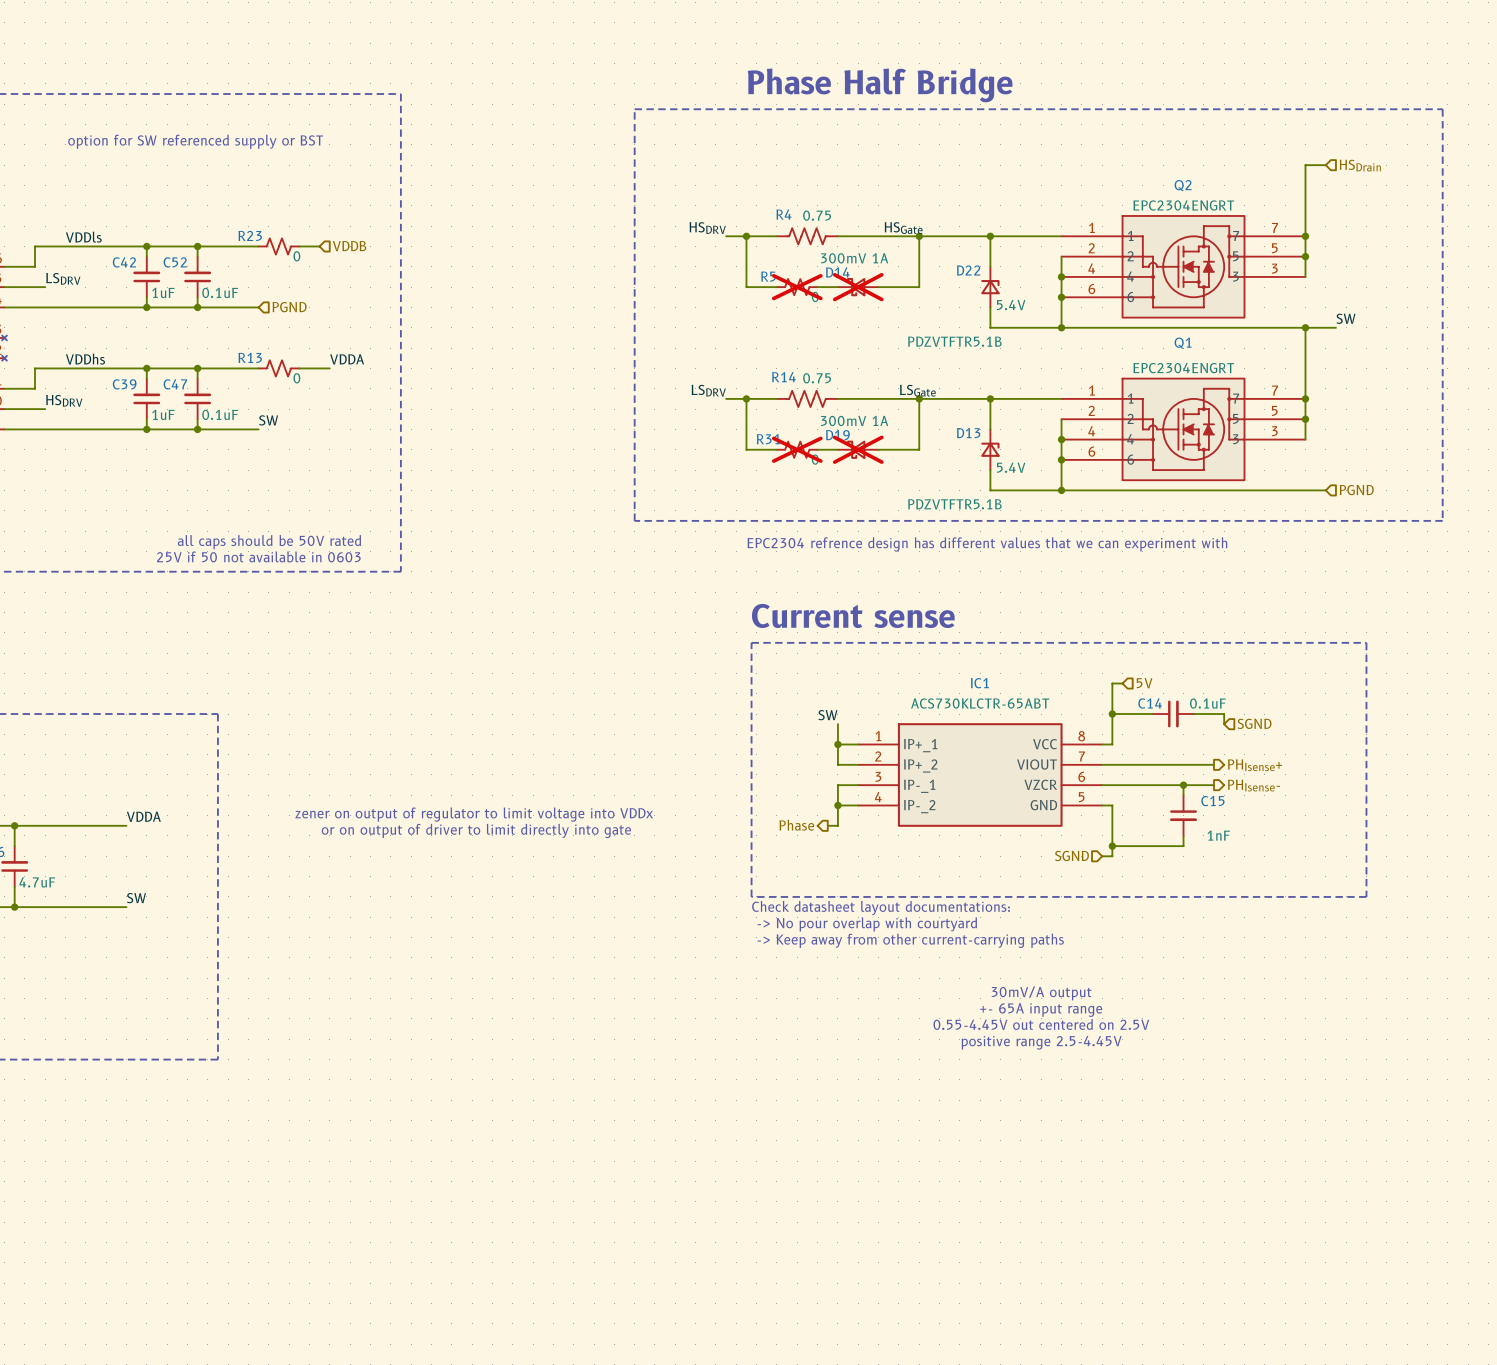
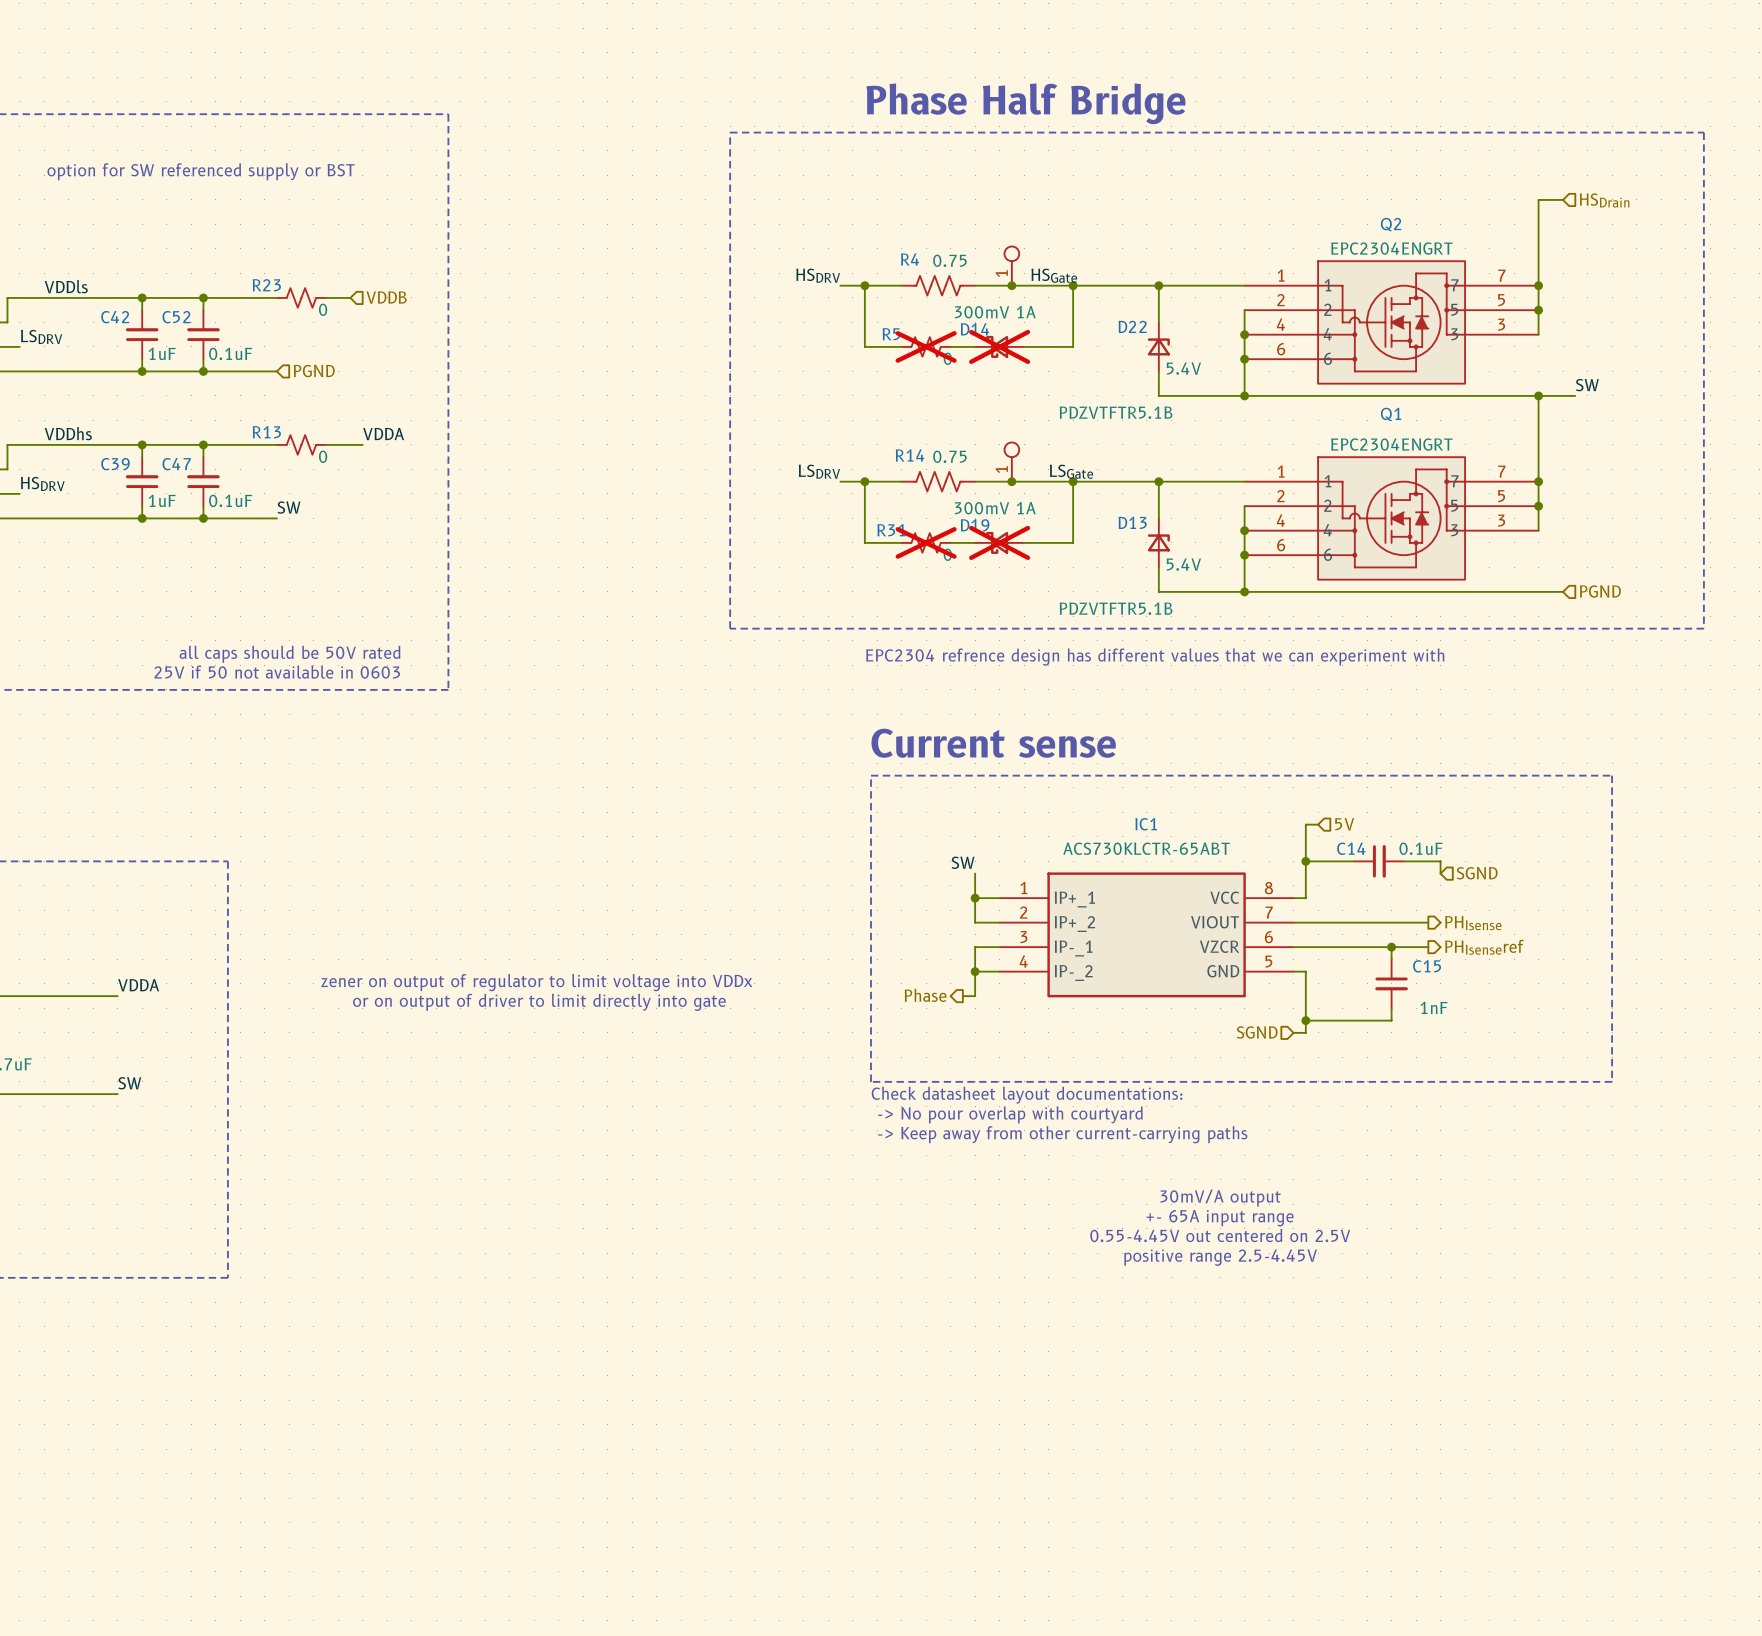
part: none -> (1011, 266)
junction: none -> (1011, 285)
part: none -> (1011, 462)
junction: none -> (1011, 481)
hierarchical label: PHIsense+ (1254, 765) -> PHIsense (1473, 923)
hierarchical label: PHIsense- (1253, 785) -> PHIsenseref (1484, 947)

